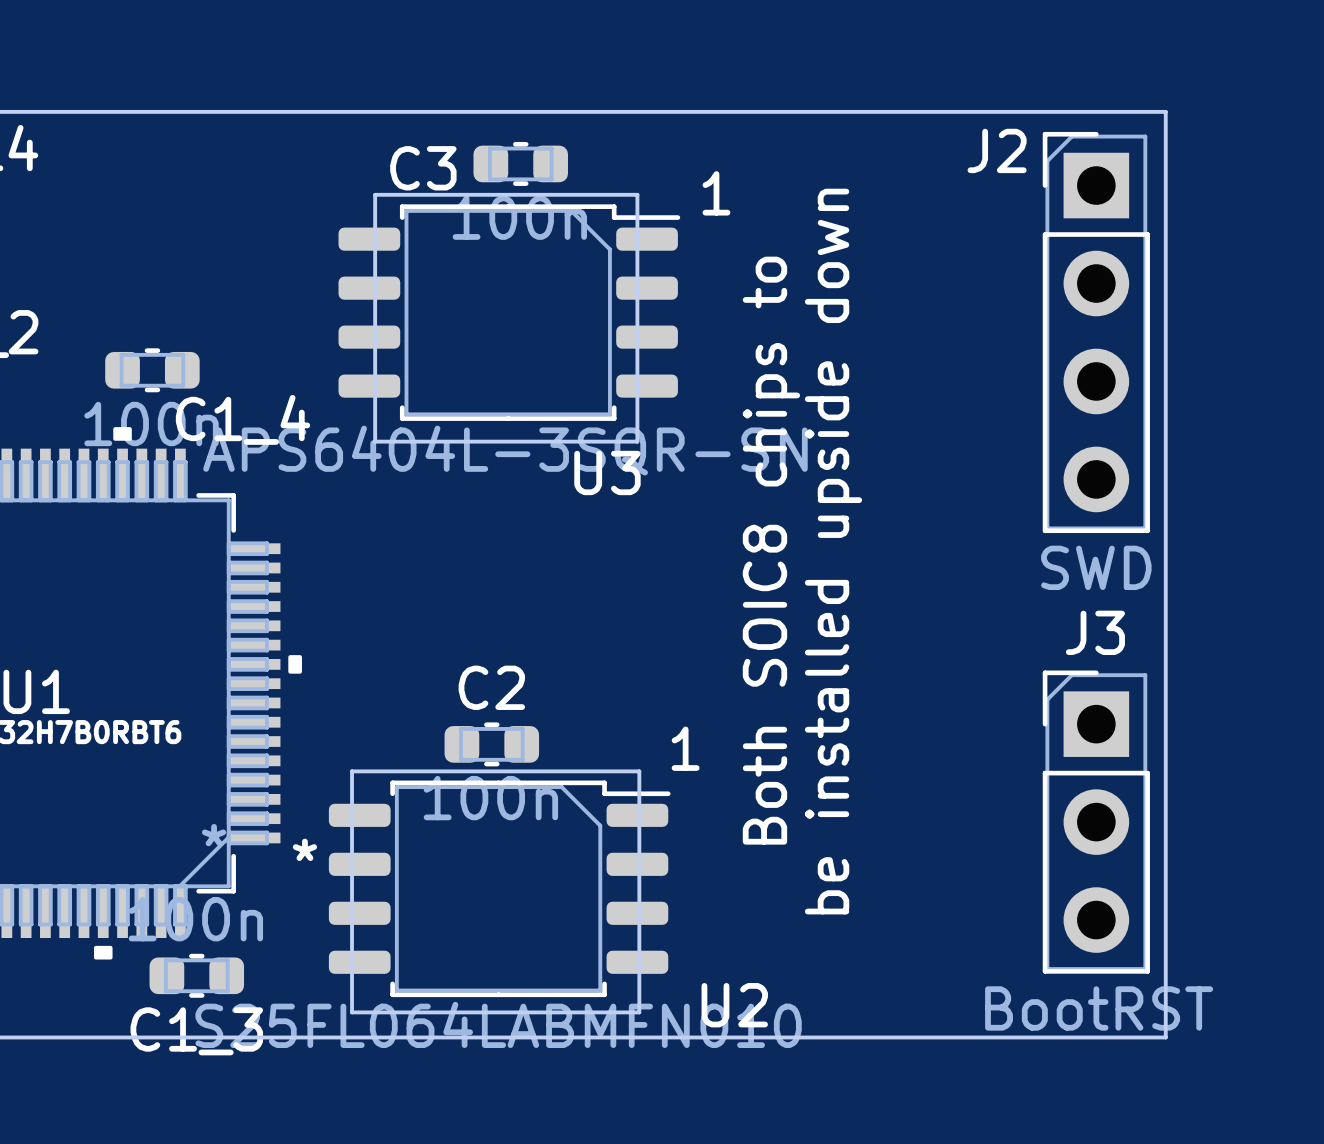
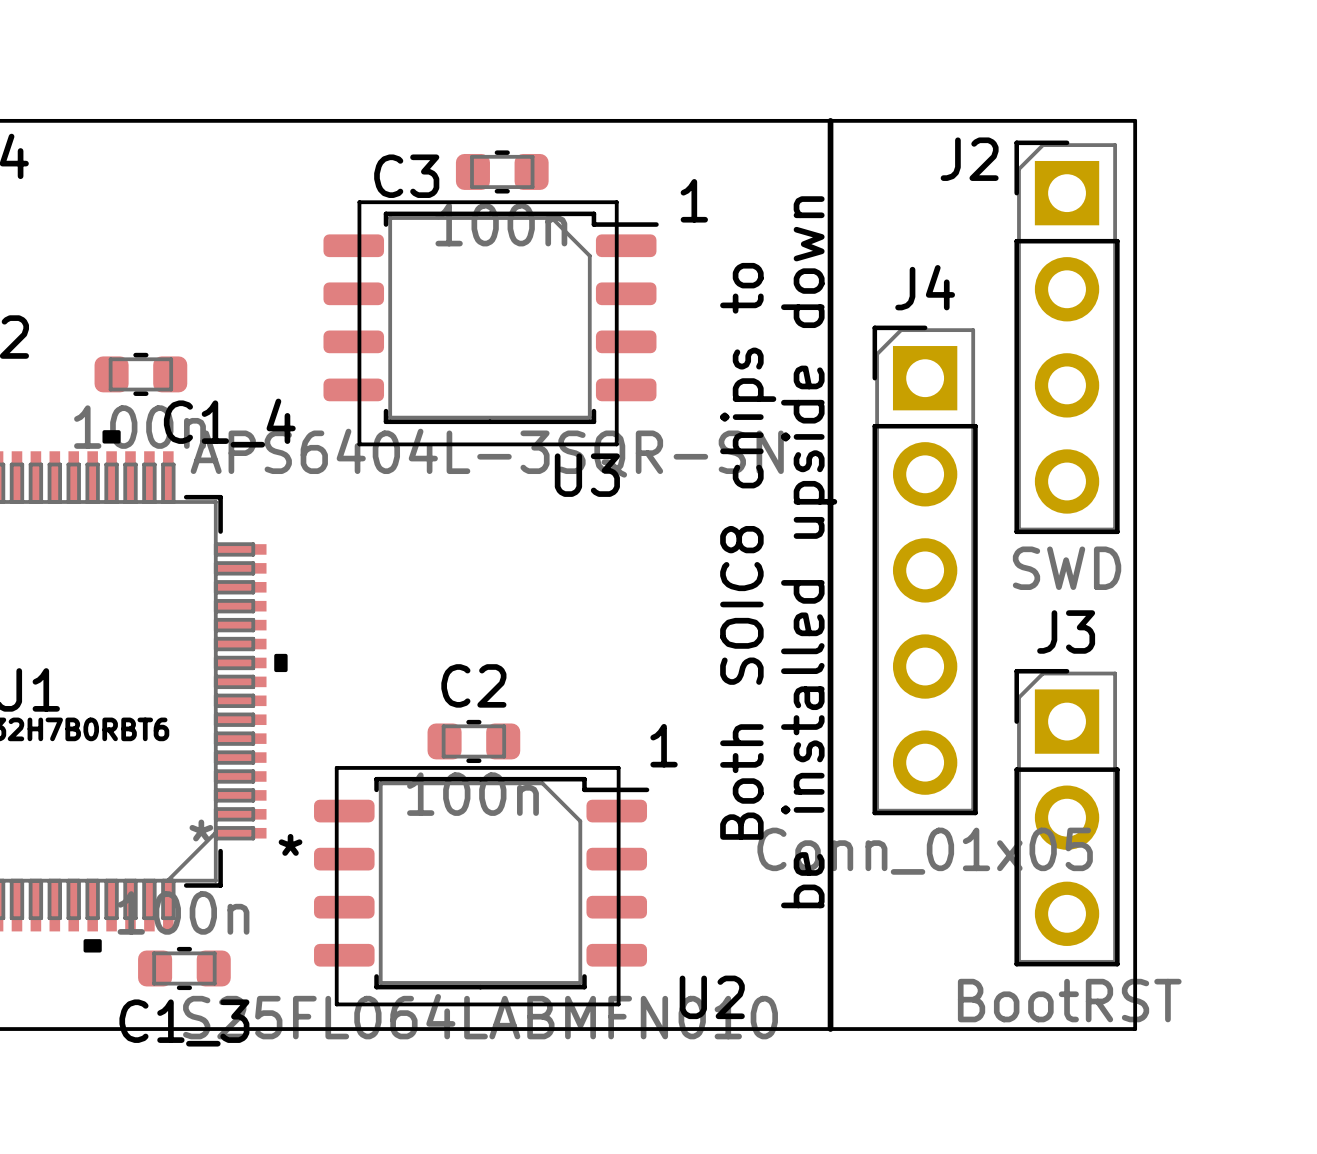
line: none -> (830, 120) (830, 1029)
J4: none -> Conn_01x05 (925, 570)

